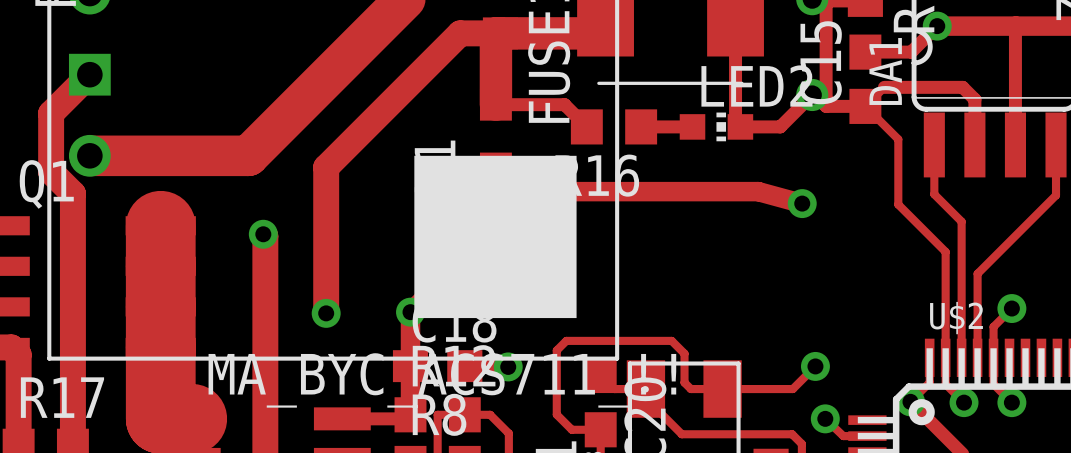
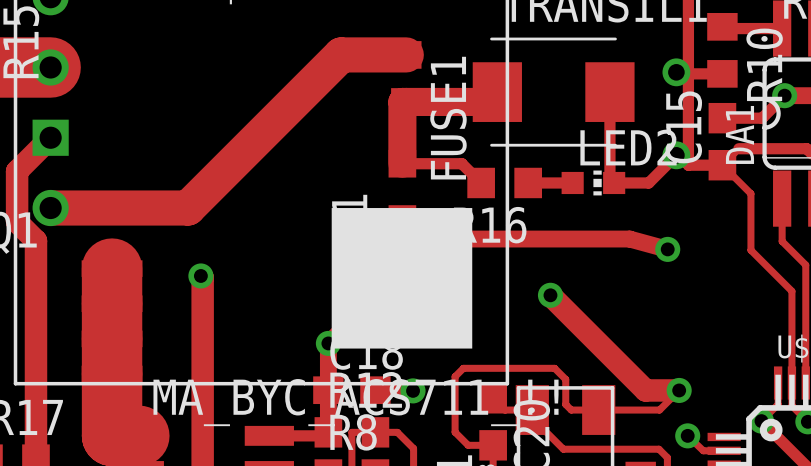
track: (500, 33) (460, 33) (326, 167) (326, 313) -> none
track: none -> (550, 295) (645, 390) (679, 390)
via: none -> (550, 295)
via: (326, 313) -> none

